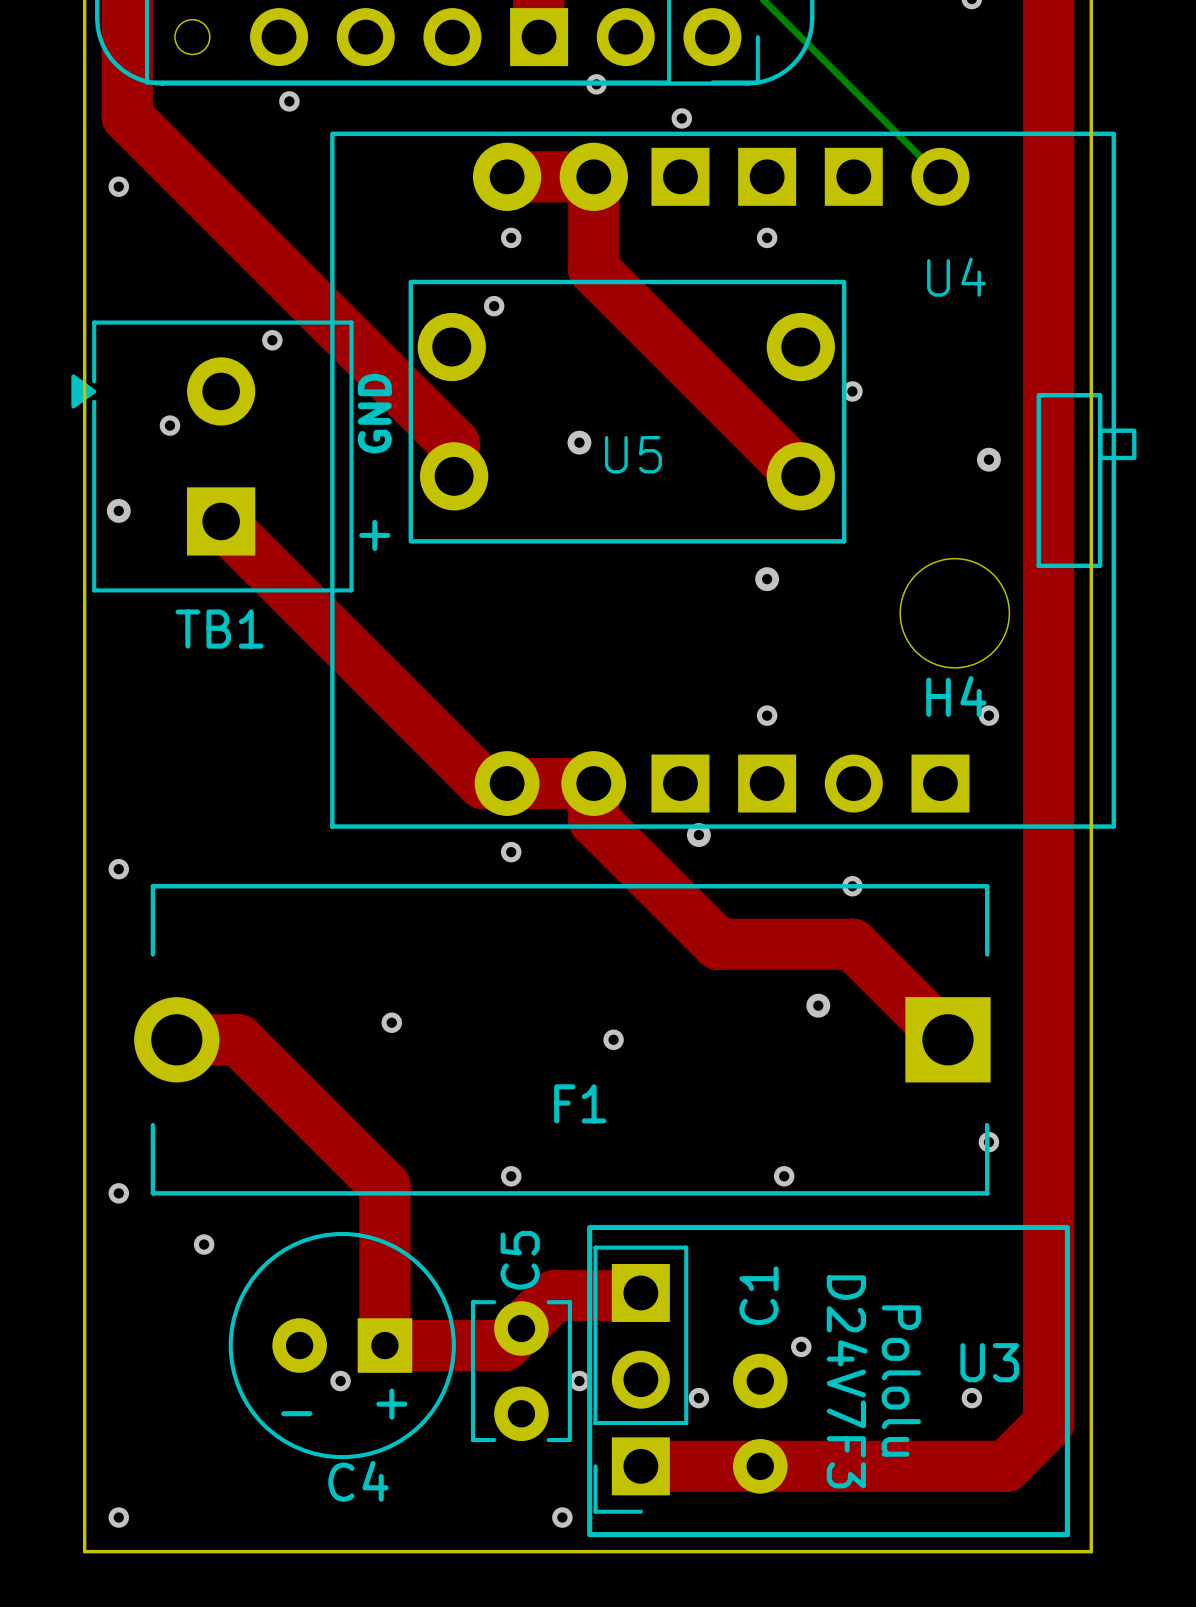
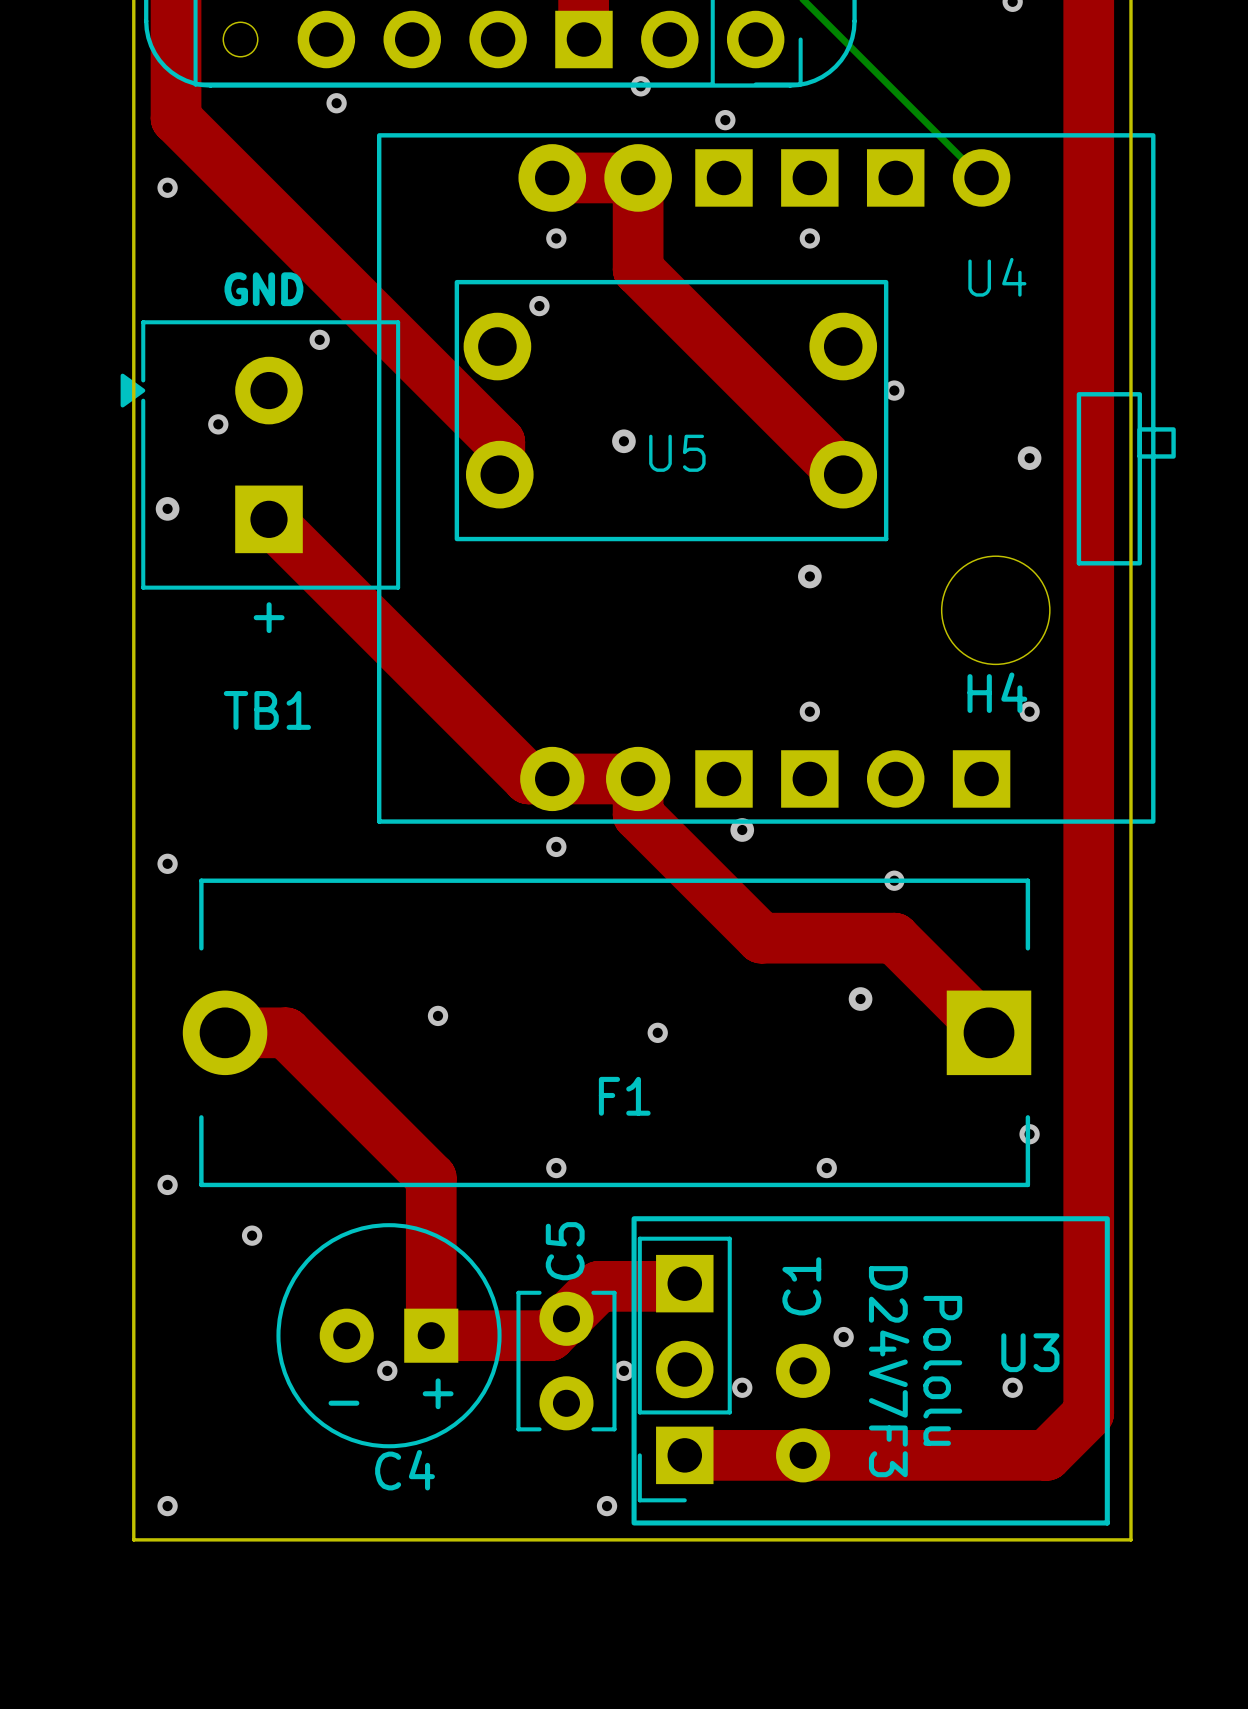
text rotation: 0° (374, 413) -> 90° clockwise (263, 289)
text position: GND (374, 413) -> GND (263, 289)
text position: + (374, 535) -> + (269, 617)
TB1 name position: TB1 (219, 629) -> TB1 (267, 710)

